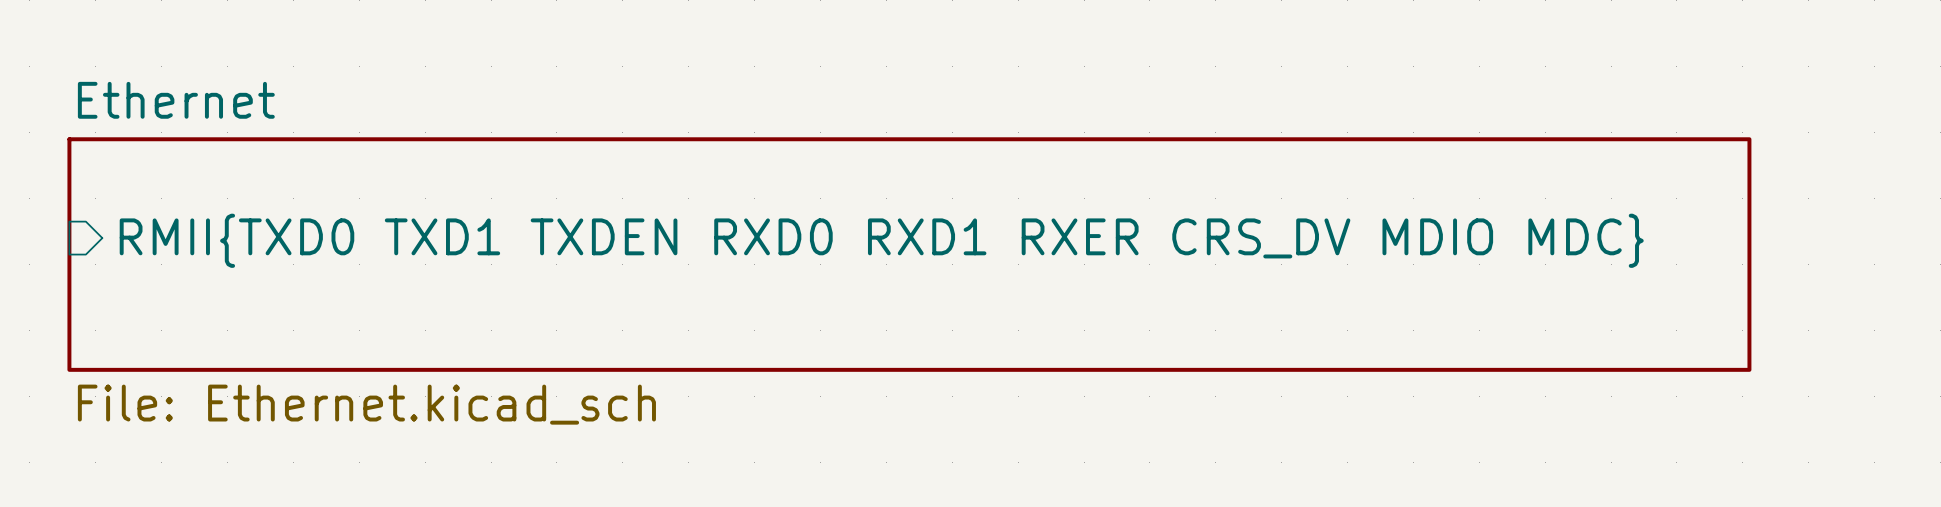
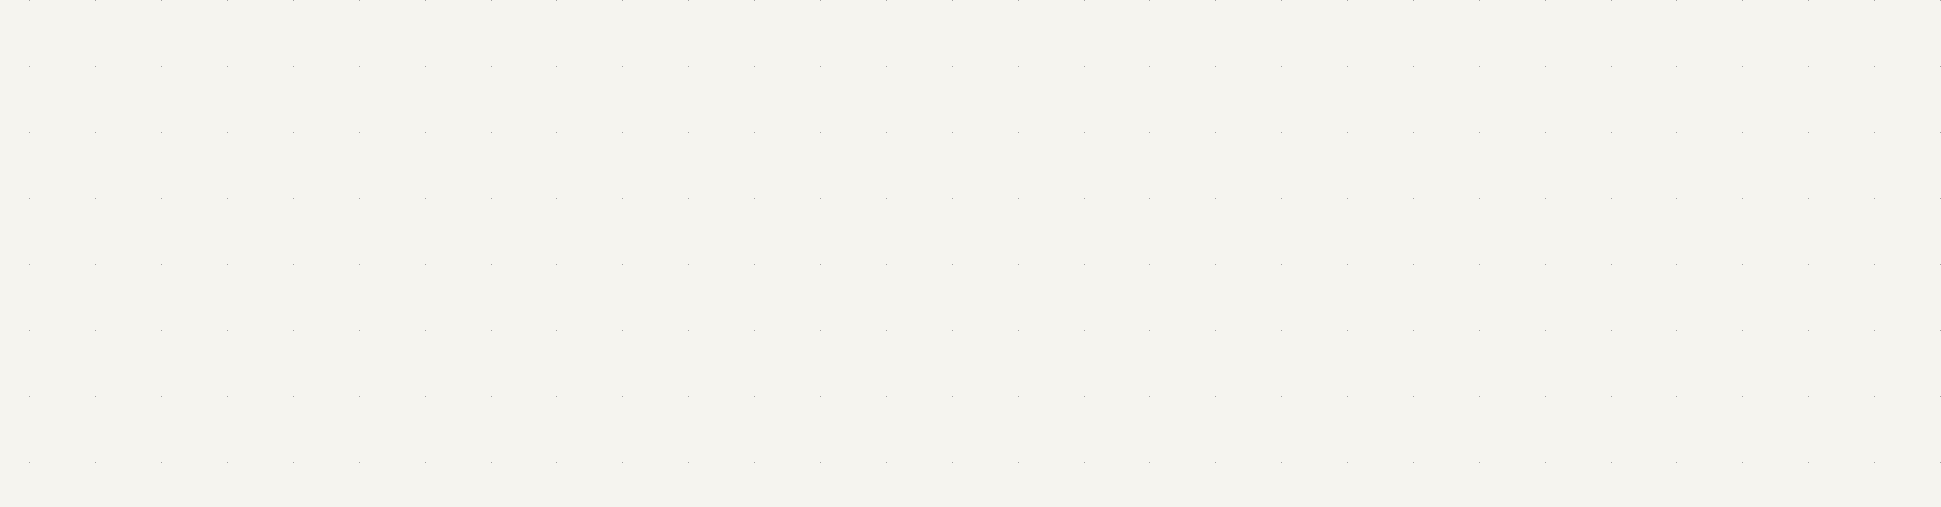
sheet pin: RMII{TXD0 TXD1 TXDEN RXD0 RXD1 RXER CRS_DV MDIO MDC} (881, 240) -> none
sheet Ethernet: File: Ethernet.kicad_sch (909, 254) -> none

